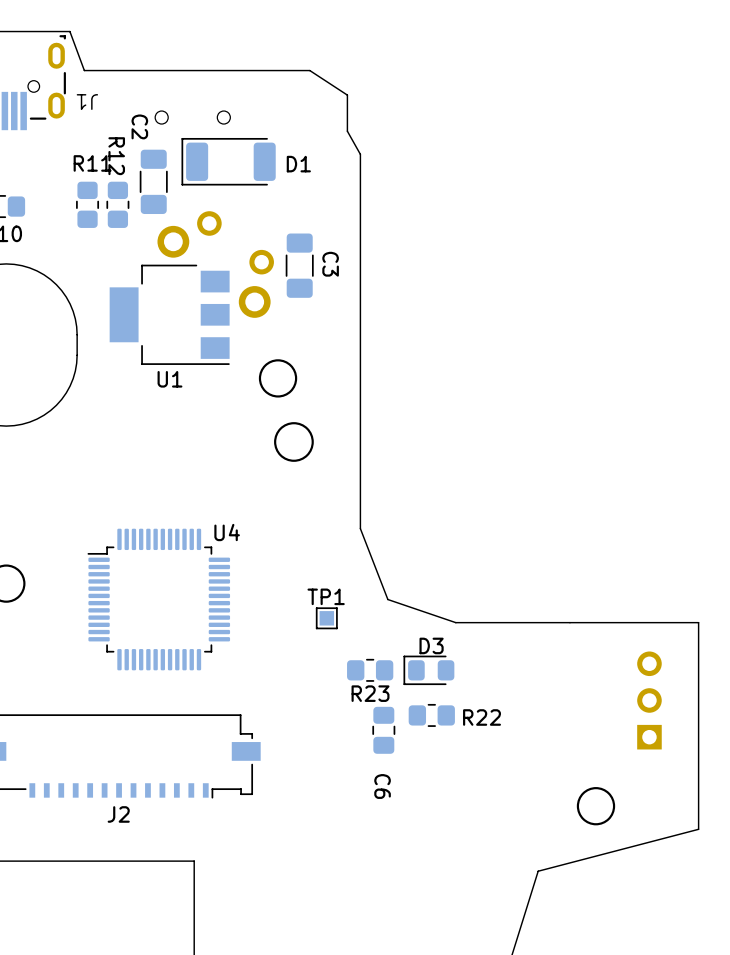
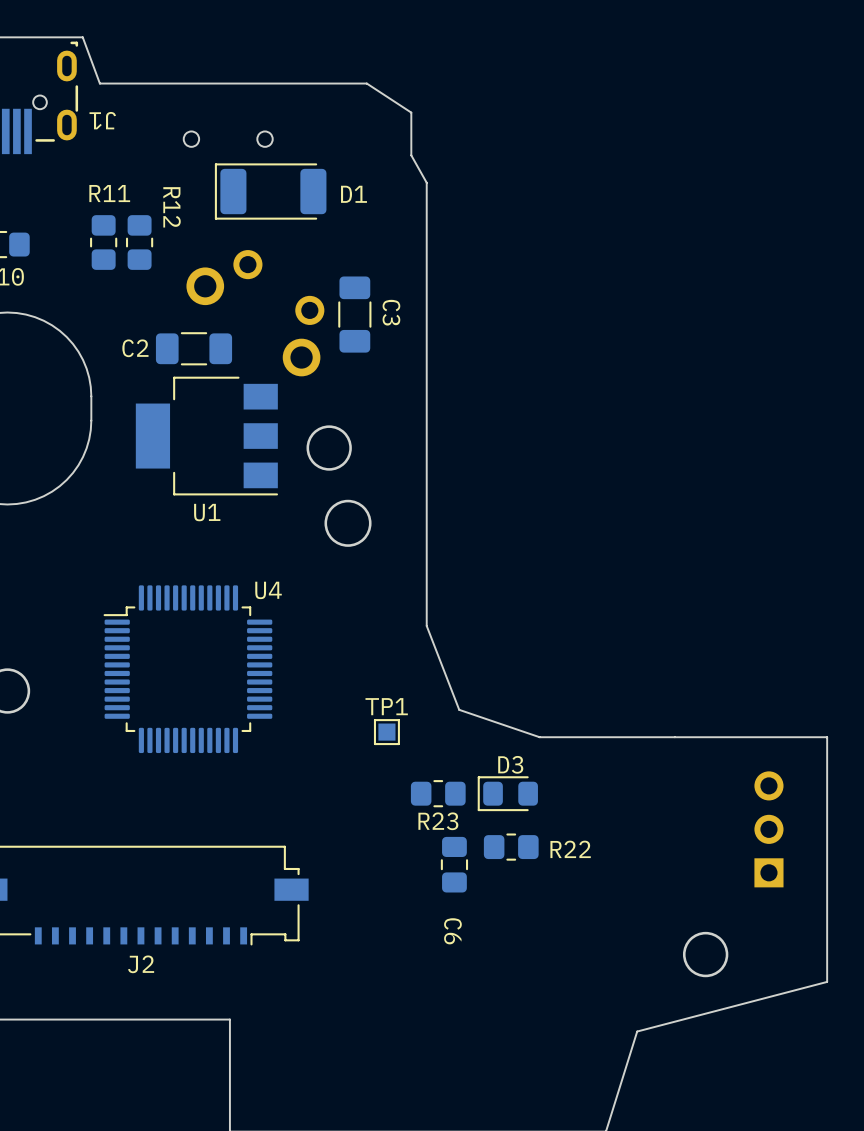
C2 name position: C2 (139, 126) -> C2 (135, 348)
R12 name position: R12 (116, 156) -> R12 (172, 207)
C2 rotation: 0° (153, 181) -> 90° clockwise (194, 348)
C2 position: (153, 181) -> (194, 348)
U1 position: (169, 314) -> (206, 436)
U4 position: (158, 599) -> (187, 669)

